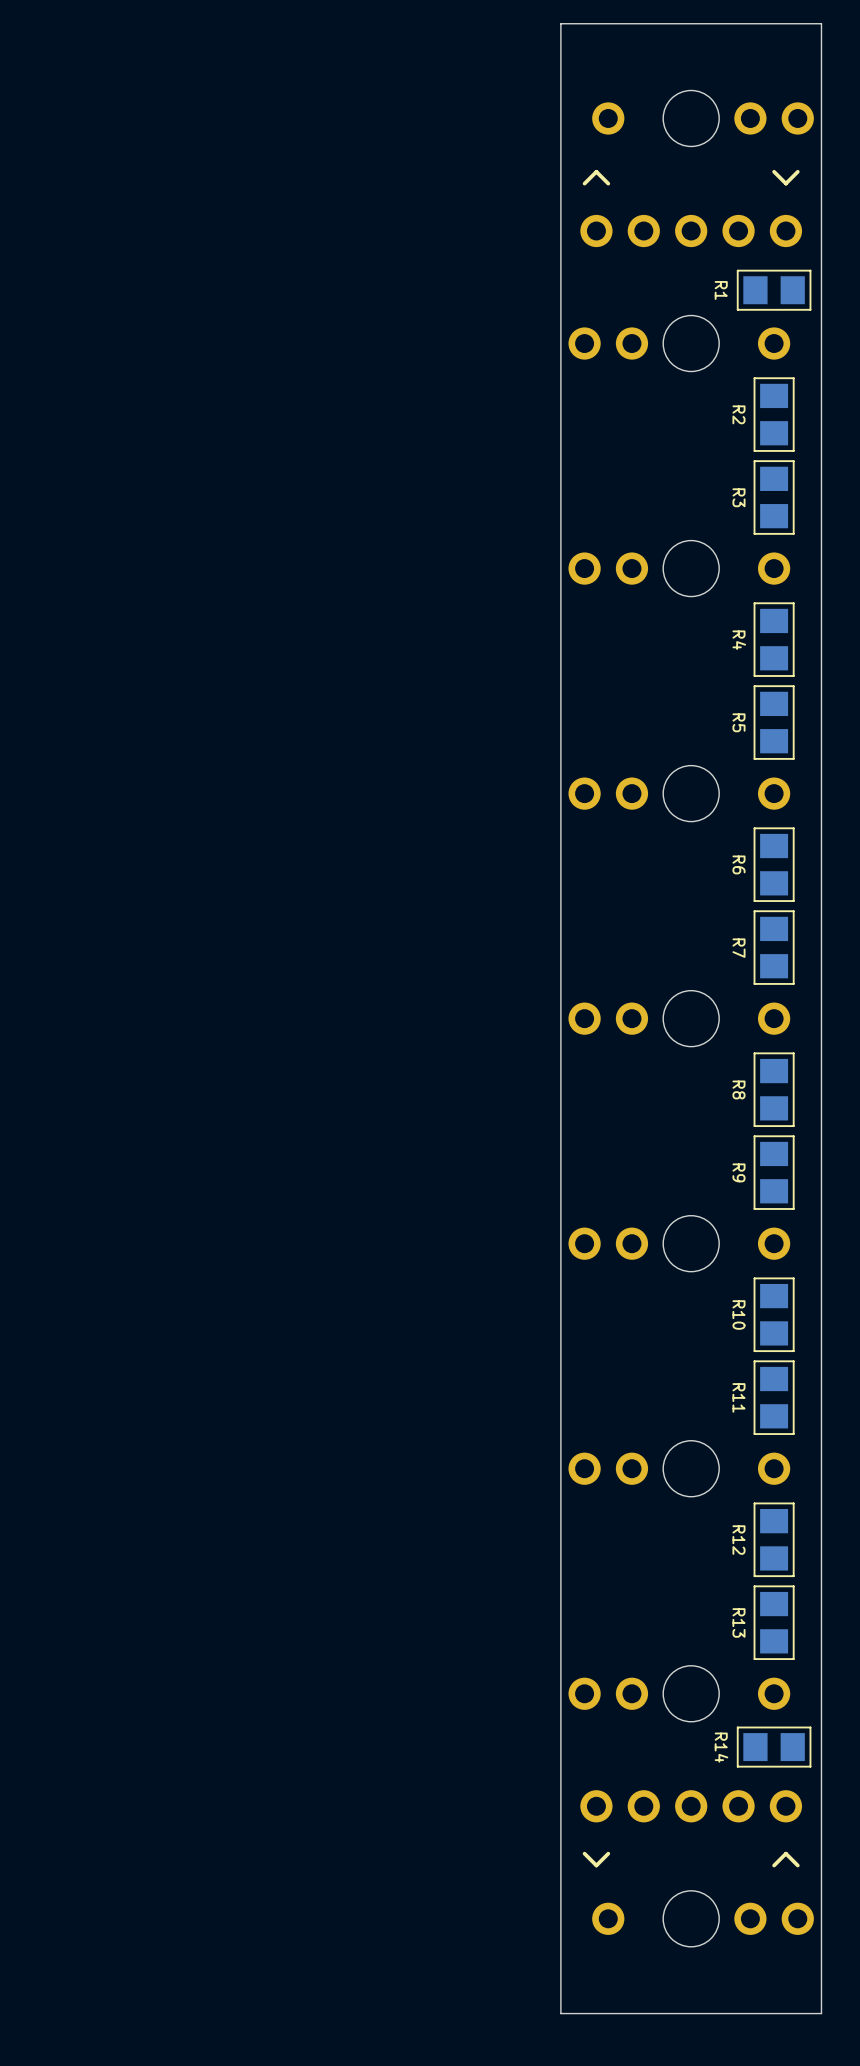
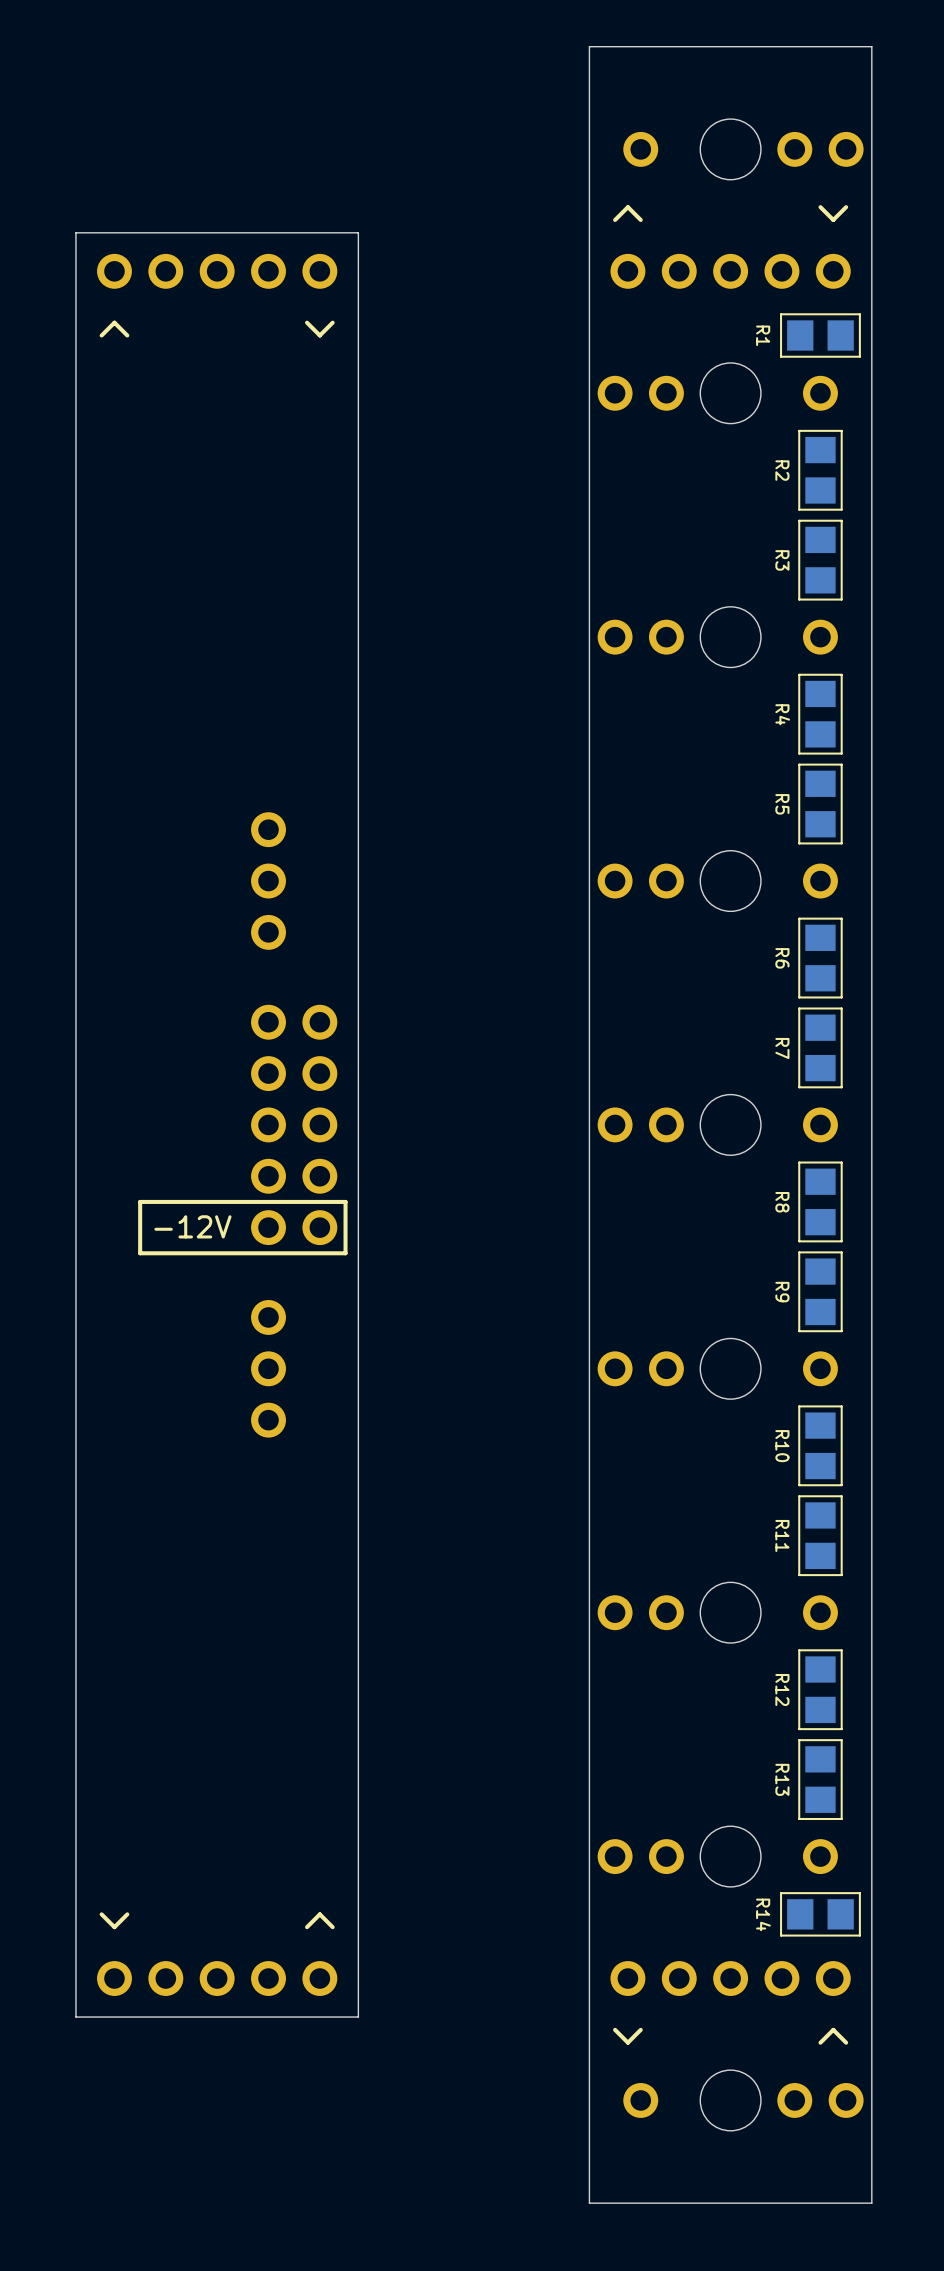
board edge: none -> (358, 232) (358, 2017) (75, 2017) (75, 232) (358, 232)
part: none -> (217, 271)
line: none -> (332, 322) (319, 335) (307, 322)
line: none -> (127, 335) (114, 322) (101, 335)
part: none -> (268, 881)
part: none -> (294, 1124)
line: none -> (345, 1201) (345, 1253) (140, 1253) (140, 1201) (345, 1201)
part: none -> (268, 1368)
line: none -> (127, 1914) (114, 1927) (101, 1914)
line: none -> (332, 1927) (319, 1914) (307, 1927)
part: none -> (217, 1978)

